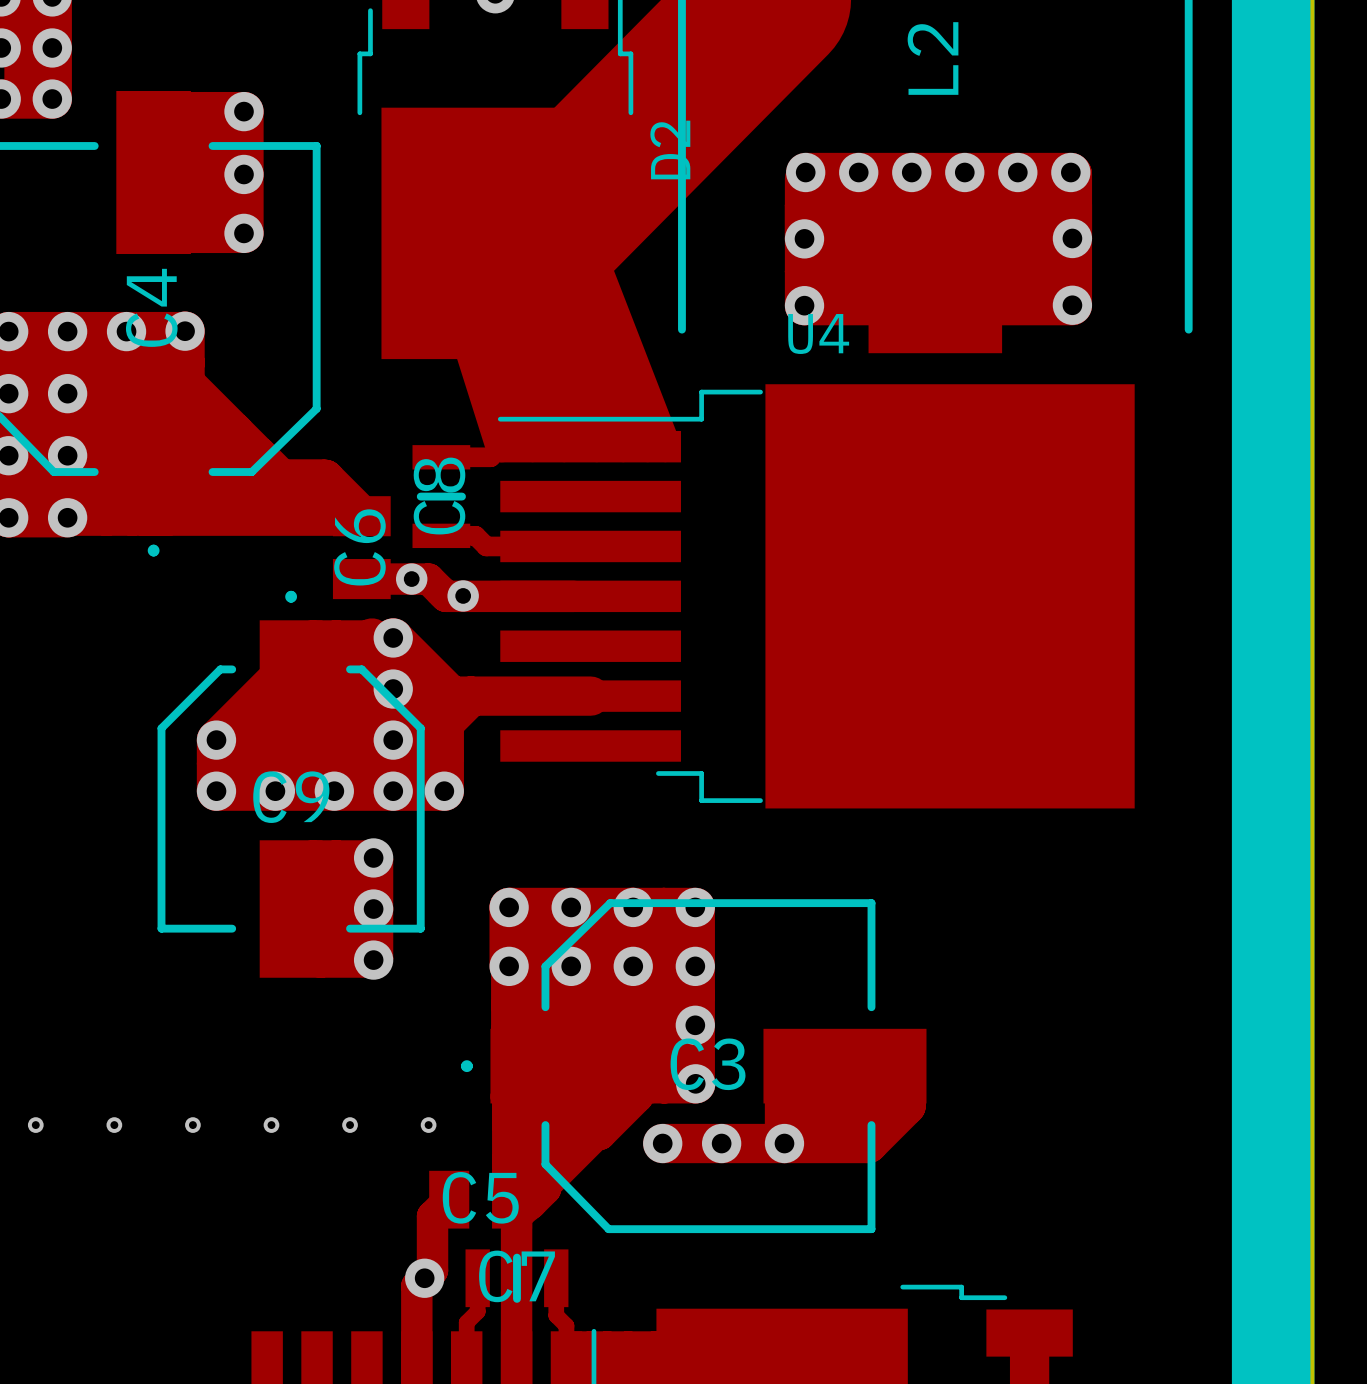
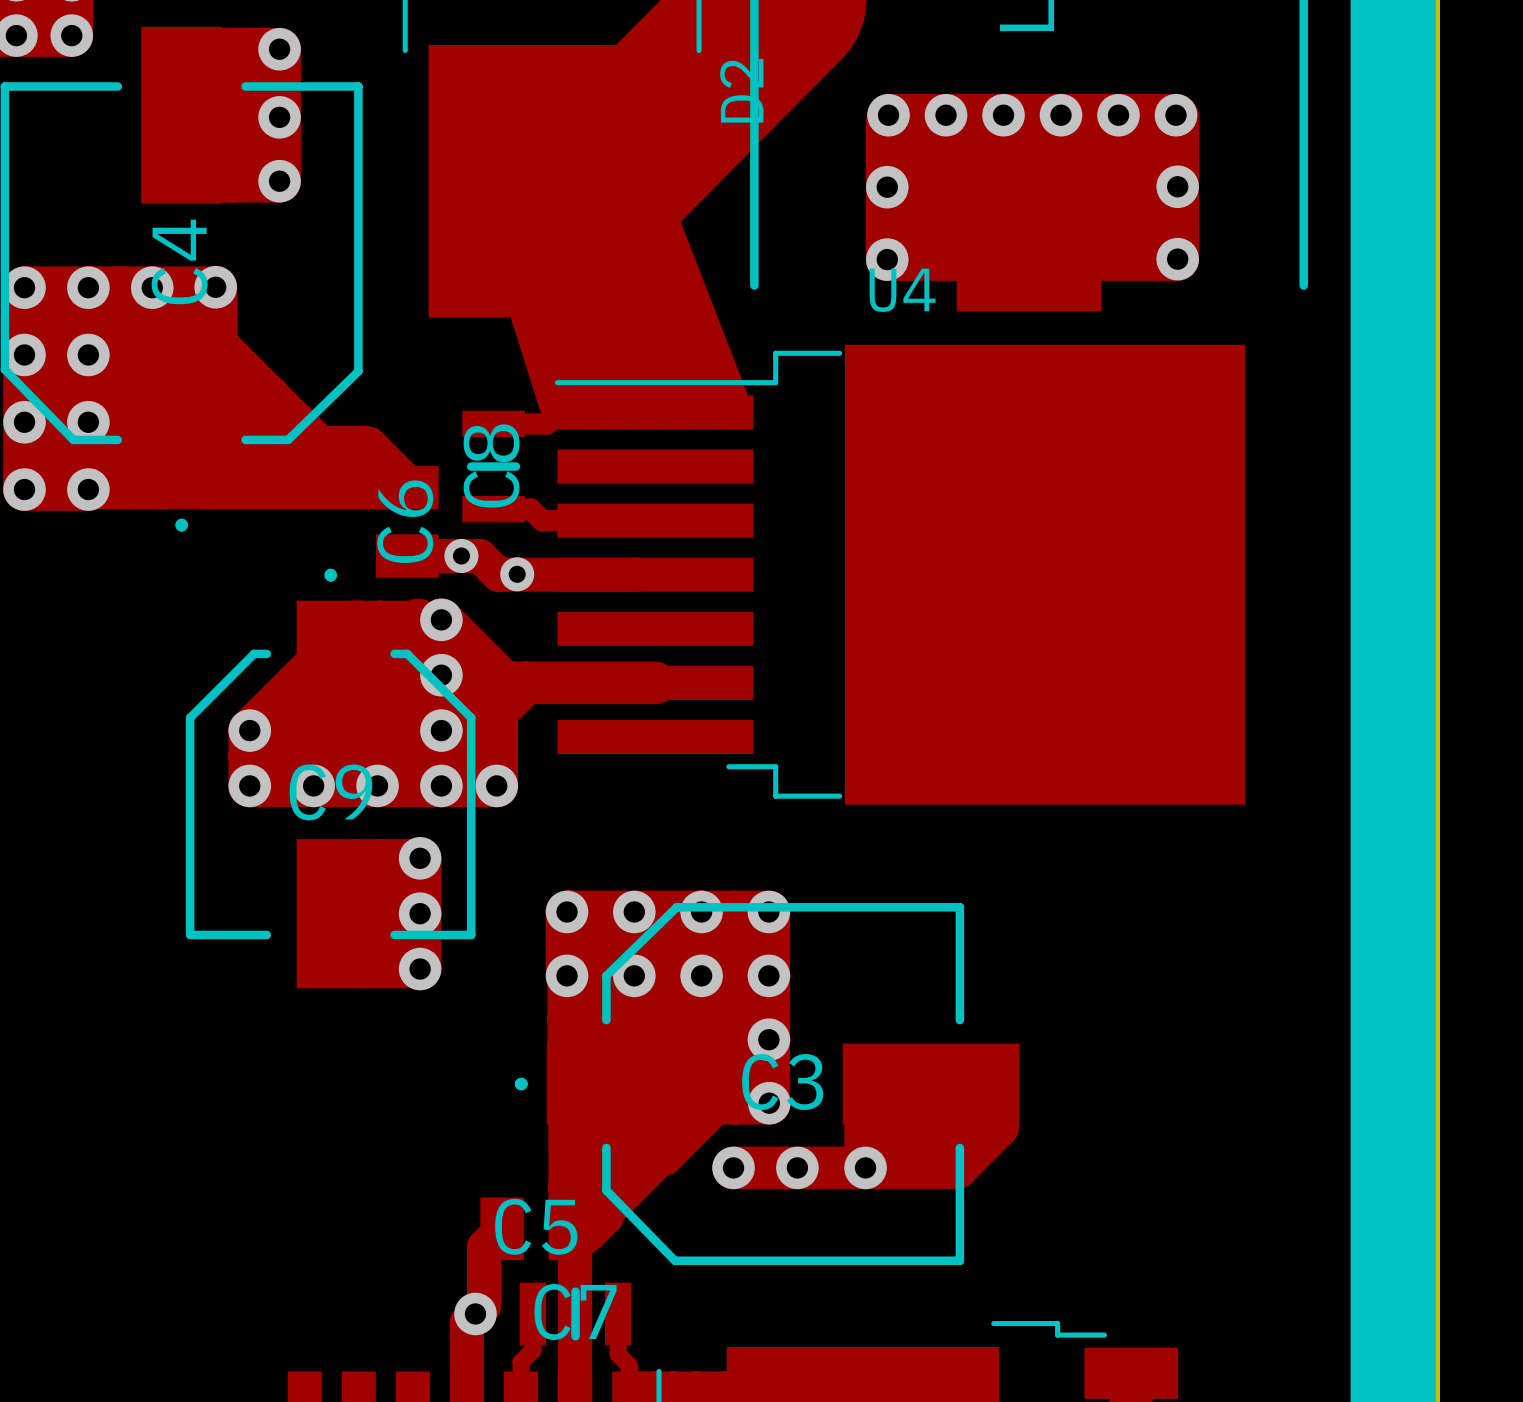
via: (35, 1125) -> none
via: (114, 1125) -> none
via: (192, 1125) -> none
via: (271, 1125) -> none
via: (350, 1125) -> none
via: (428, 1125) -> none

